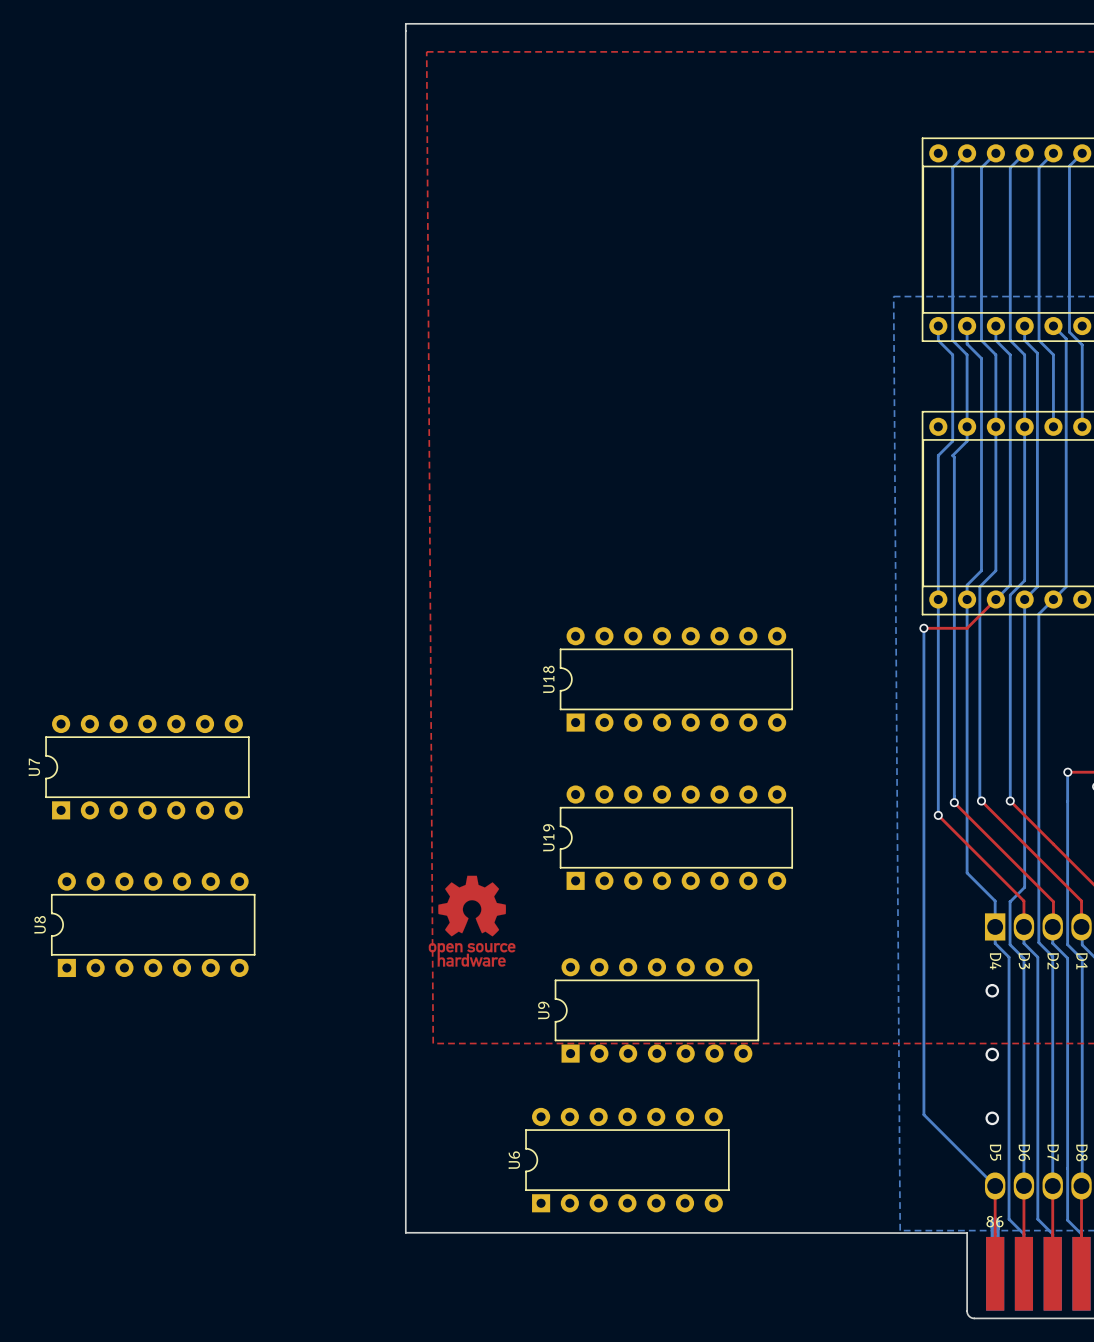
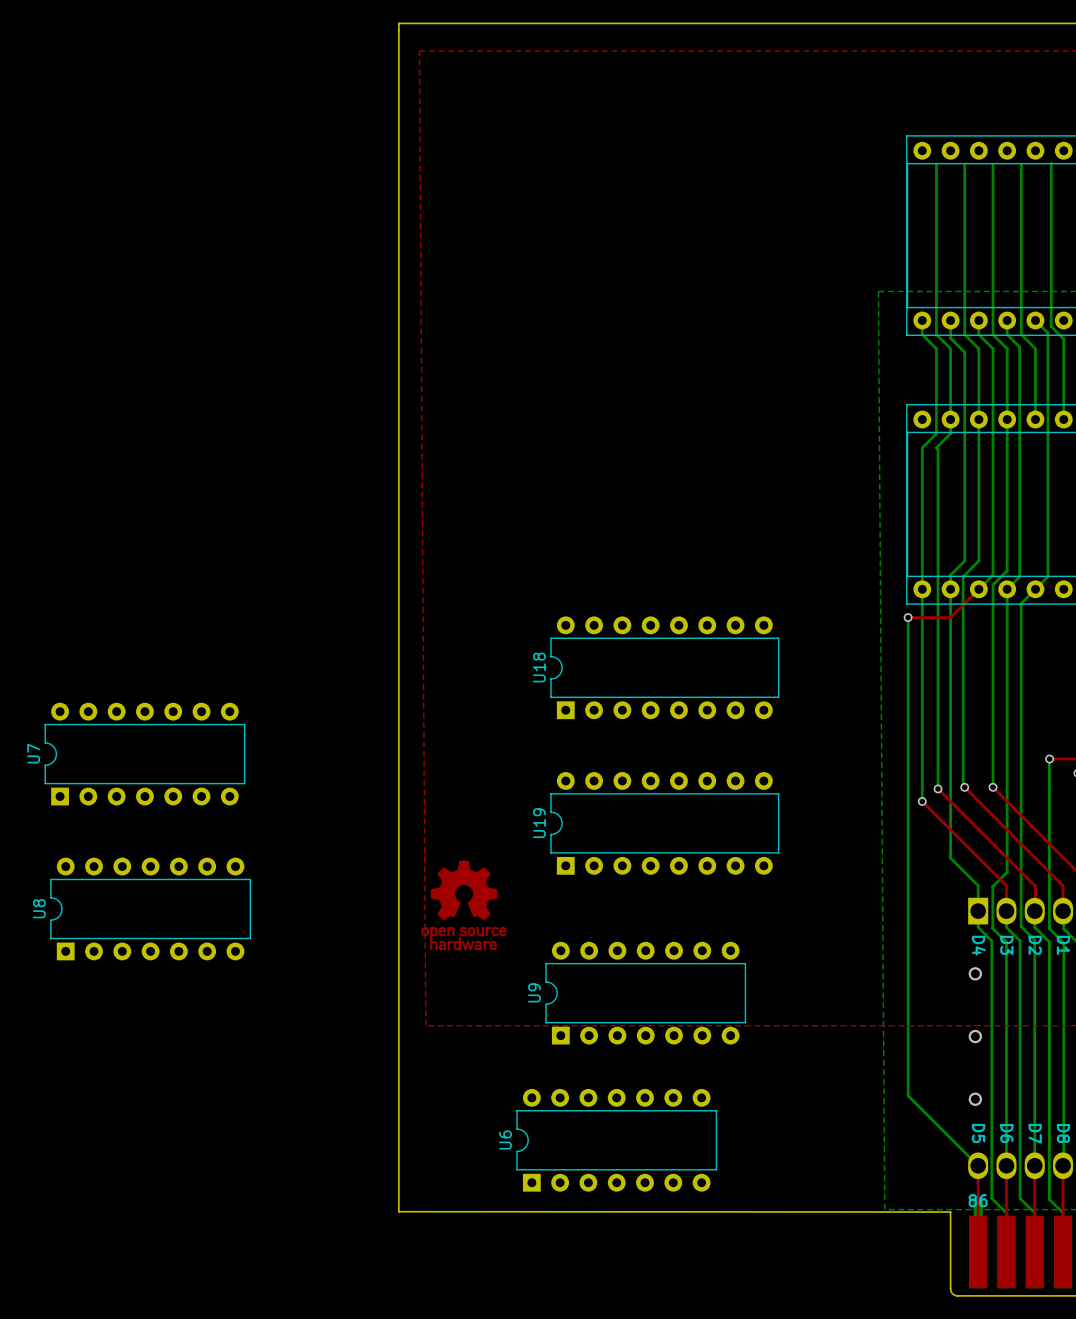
bottom track: (967, 153) (952, 167) -> none
bottom track: (995, 153) (981, 167) -> none
bottom track: (1024, 153) (1010, 167) -> none
bottom track: (1053, 153) (1039, 167) -> none
bottom track: (1082, 153) (1069, 166) -> none

